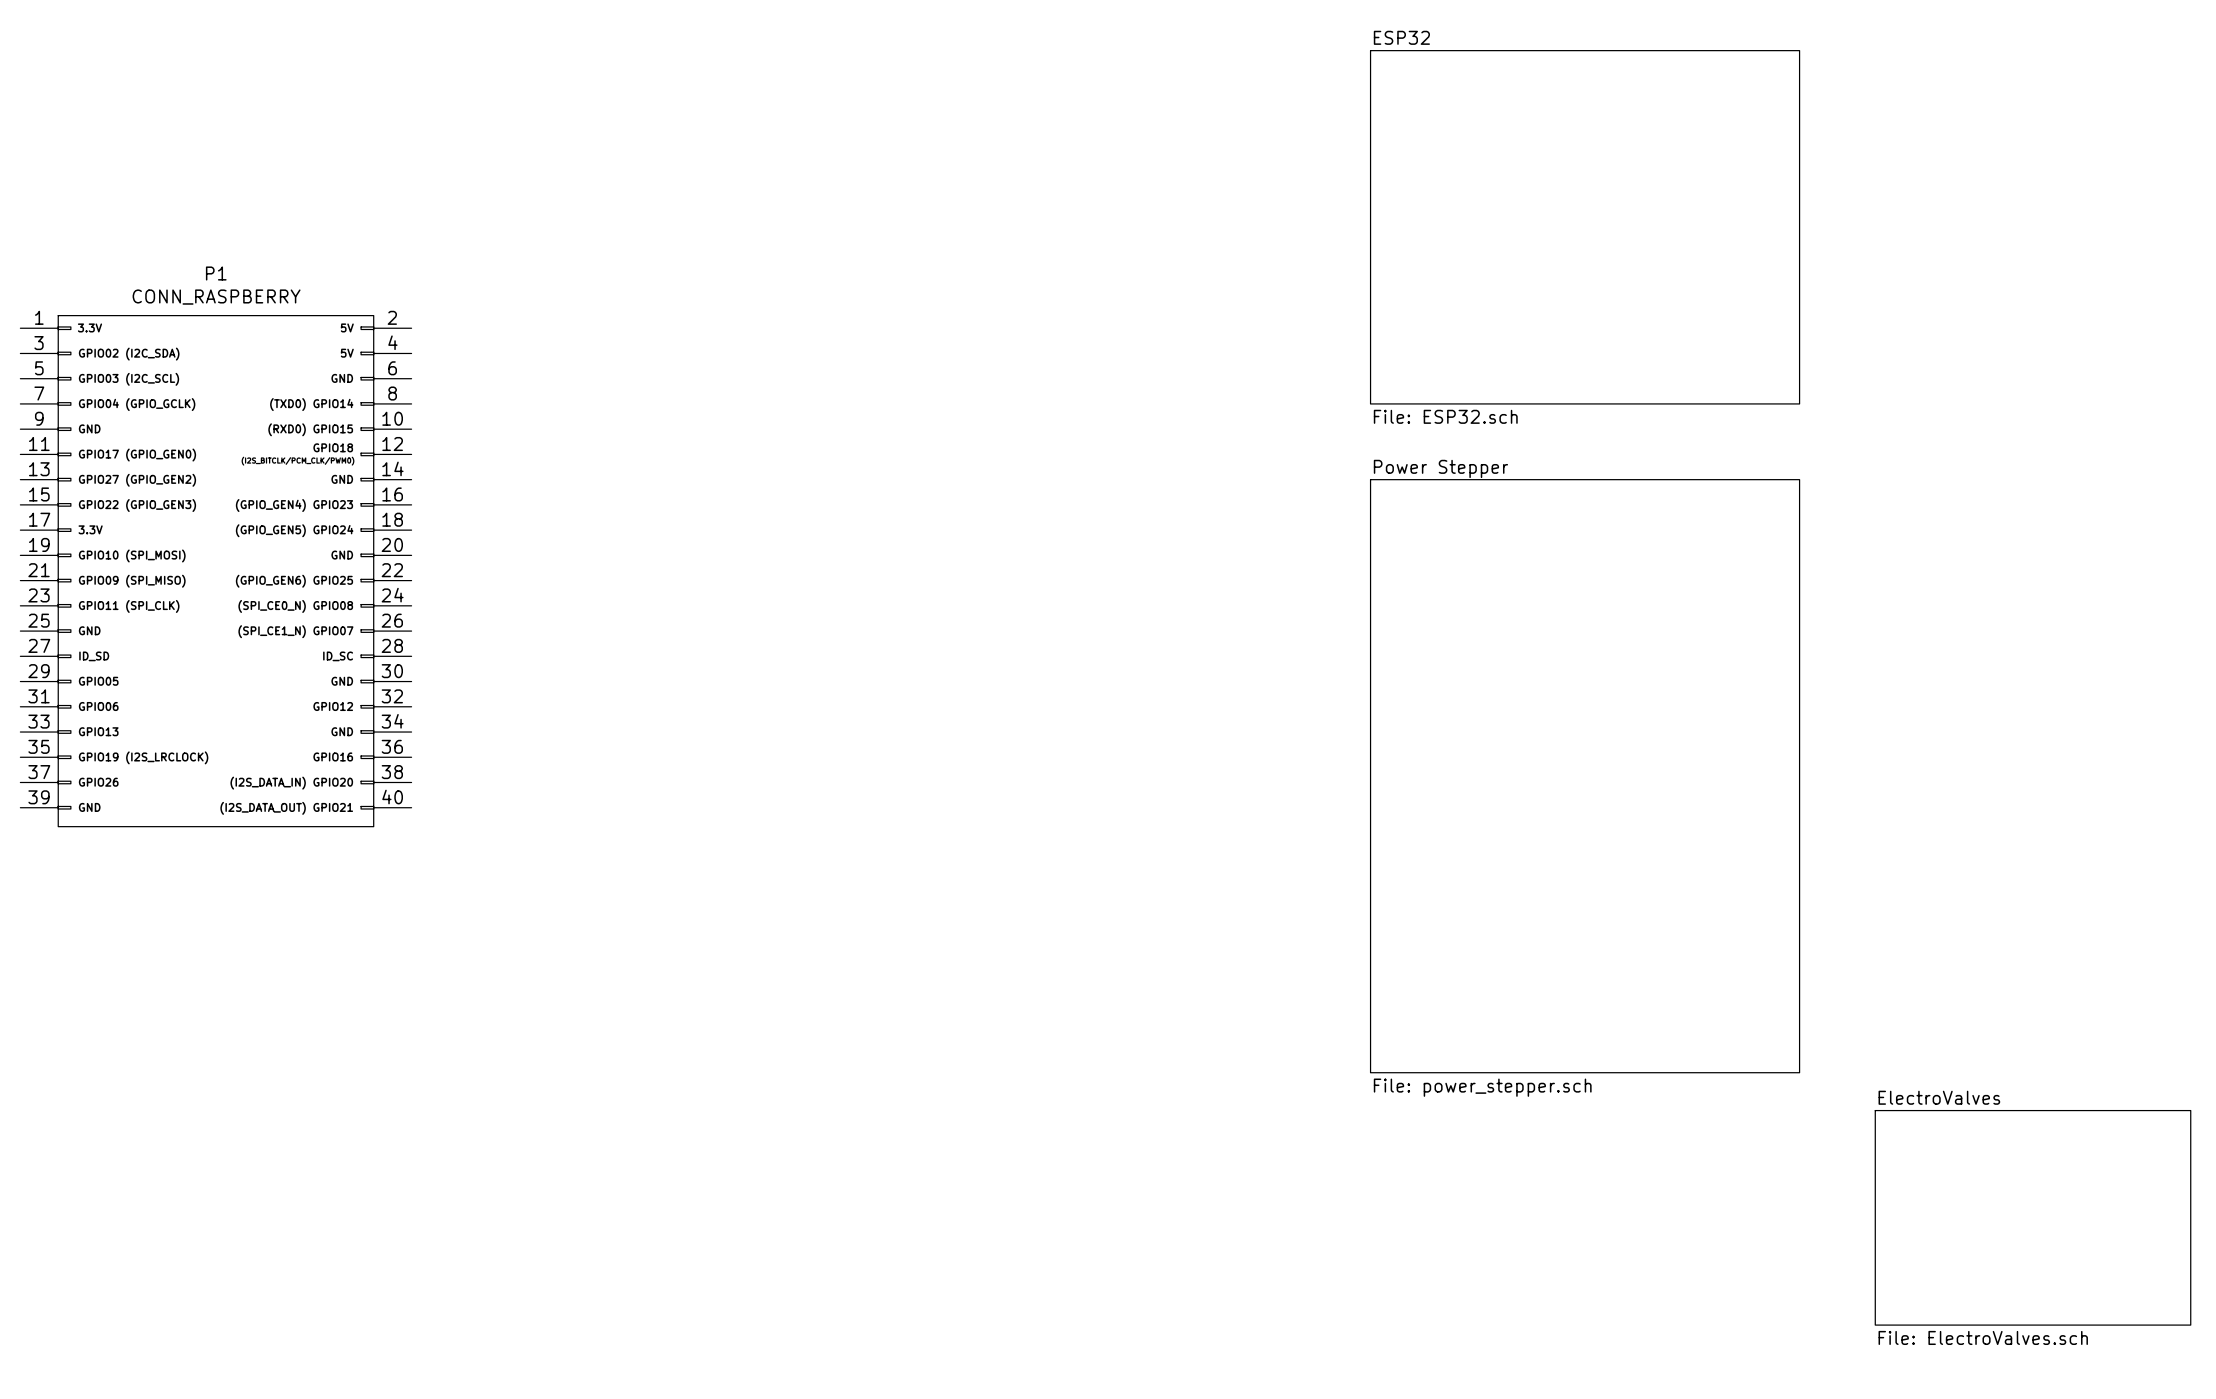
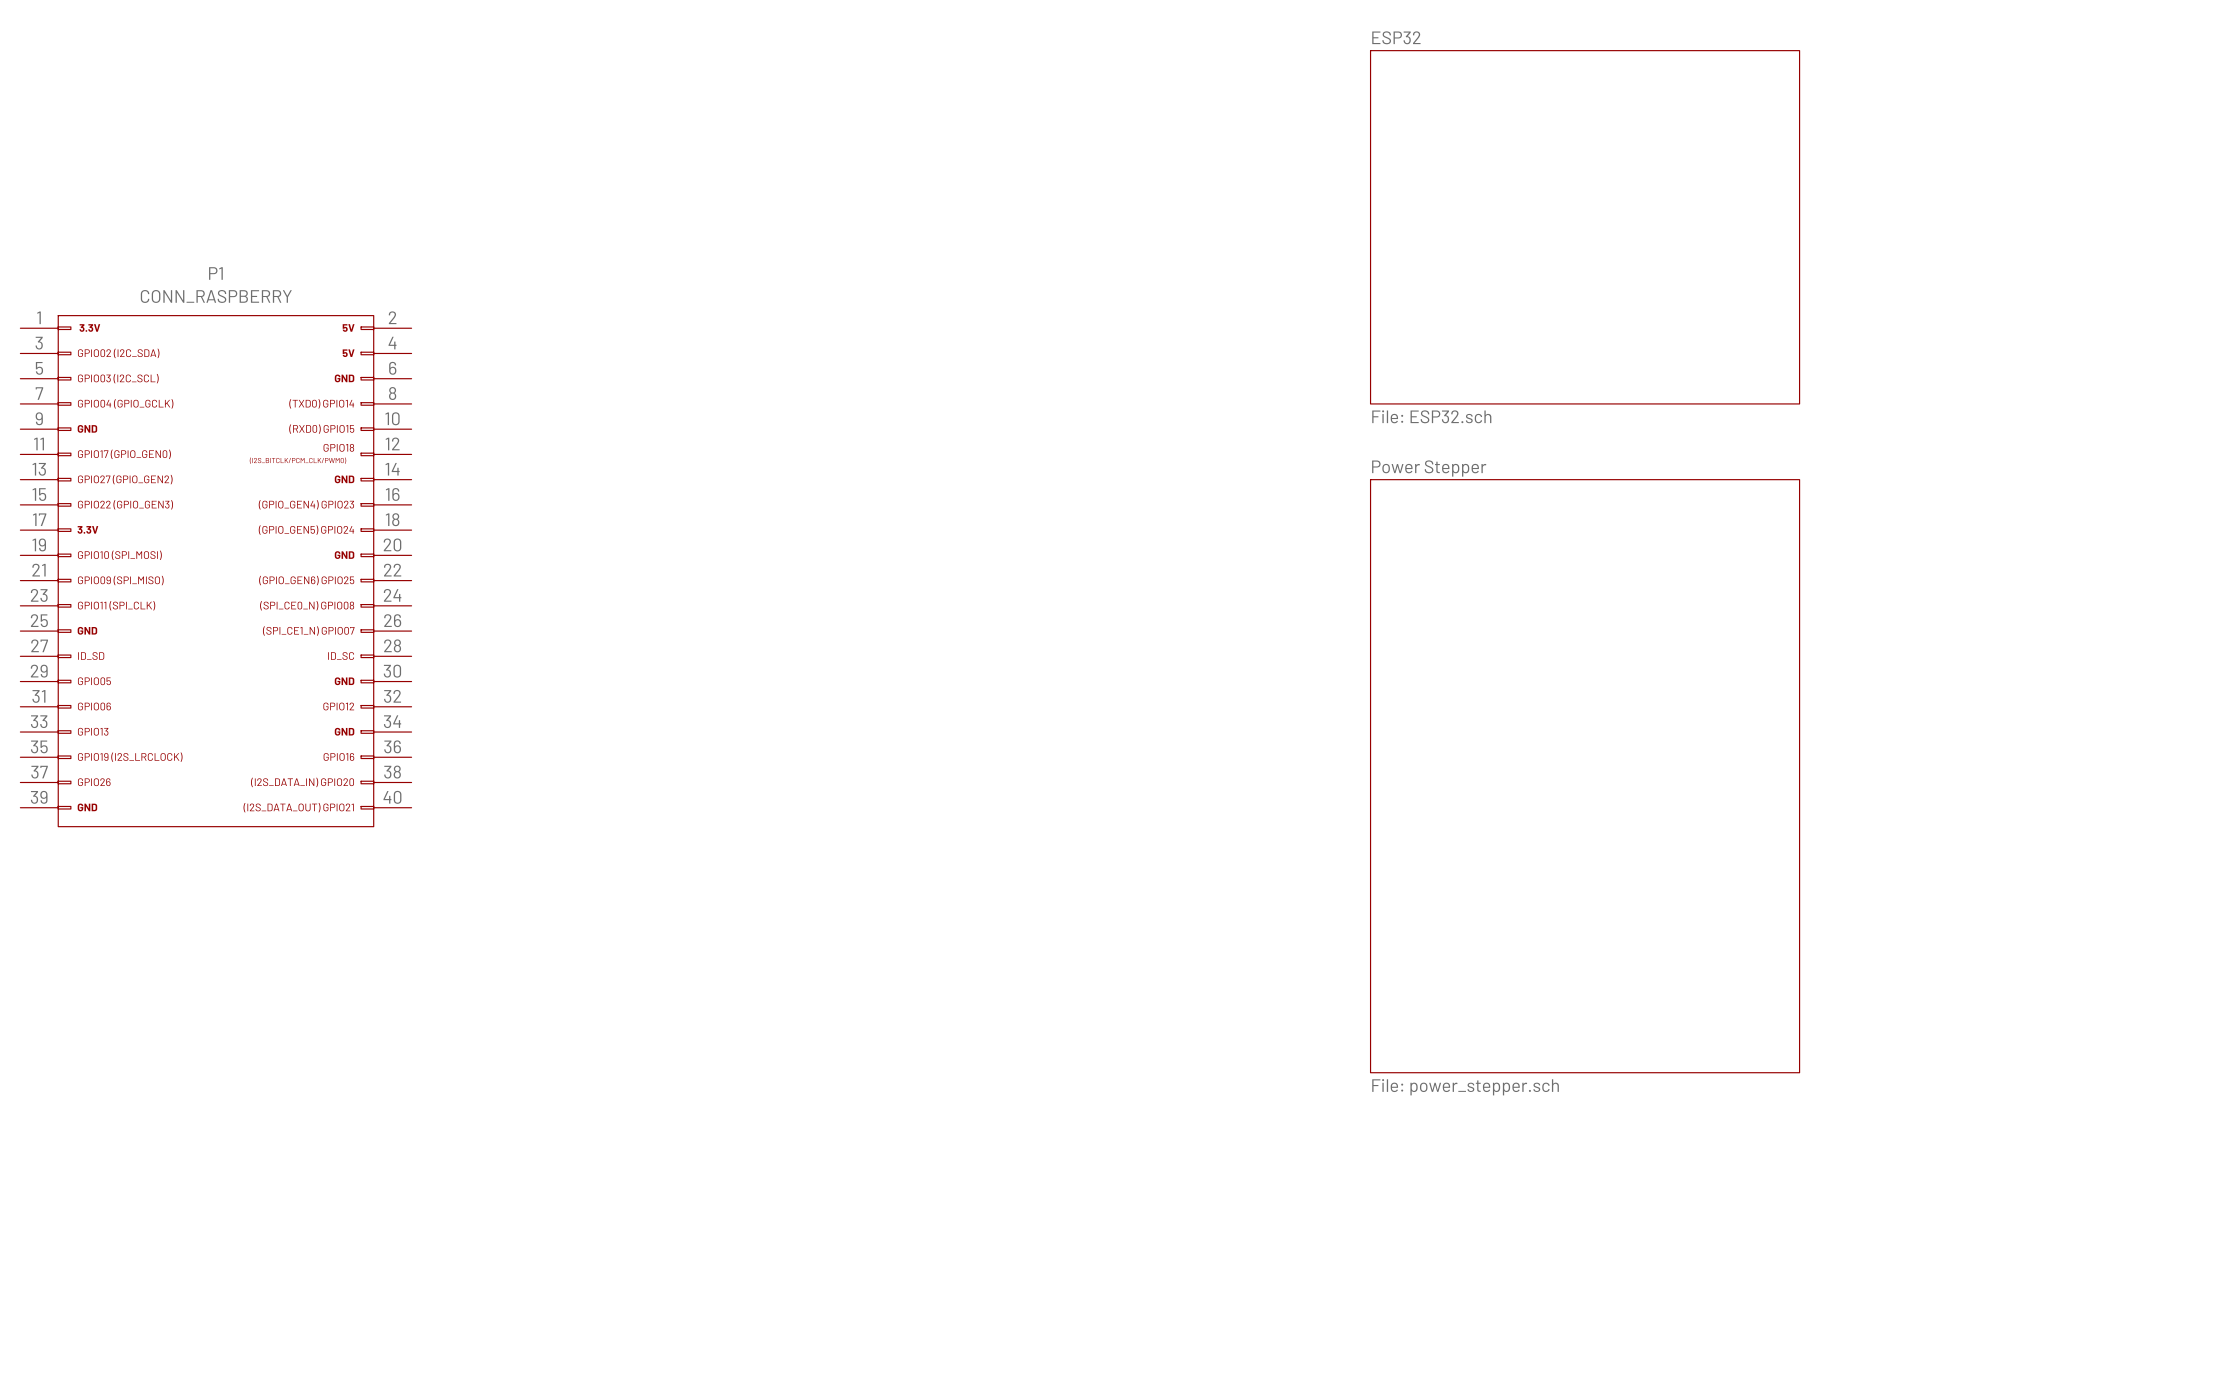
sheet ElectroValves: File: ElectroValves.sch (2033, 1217) -> none

